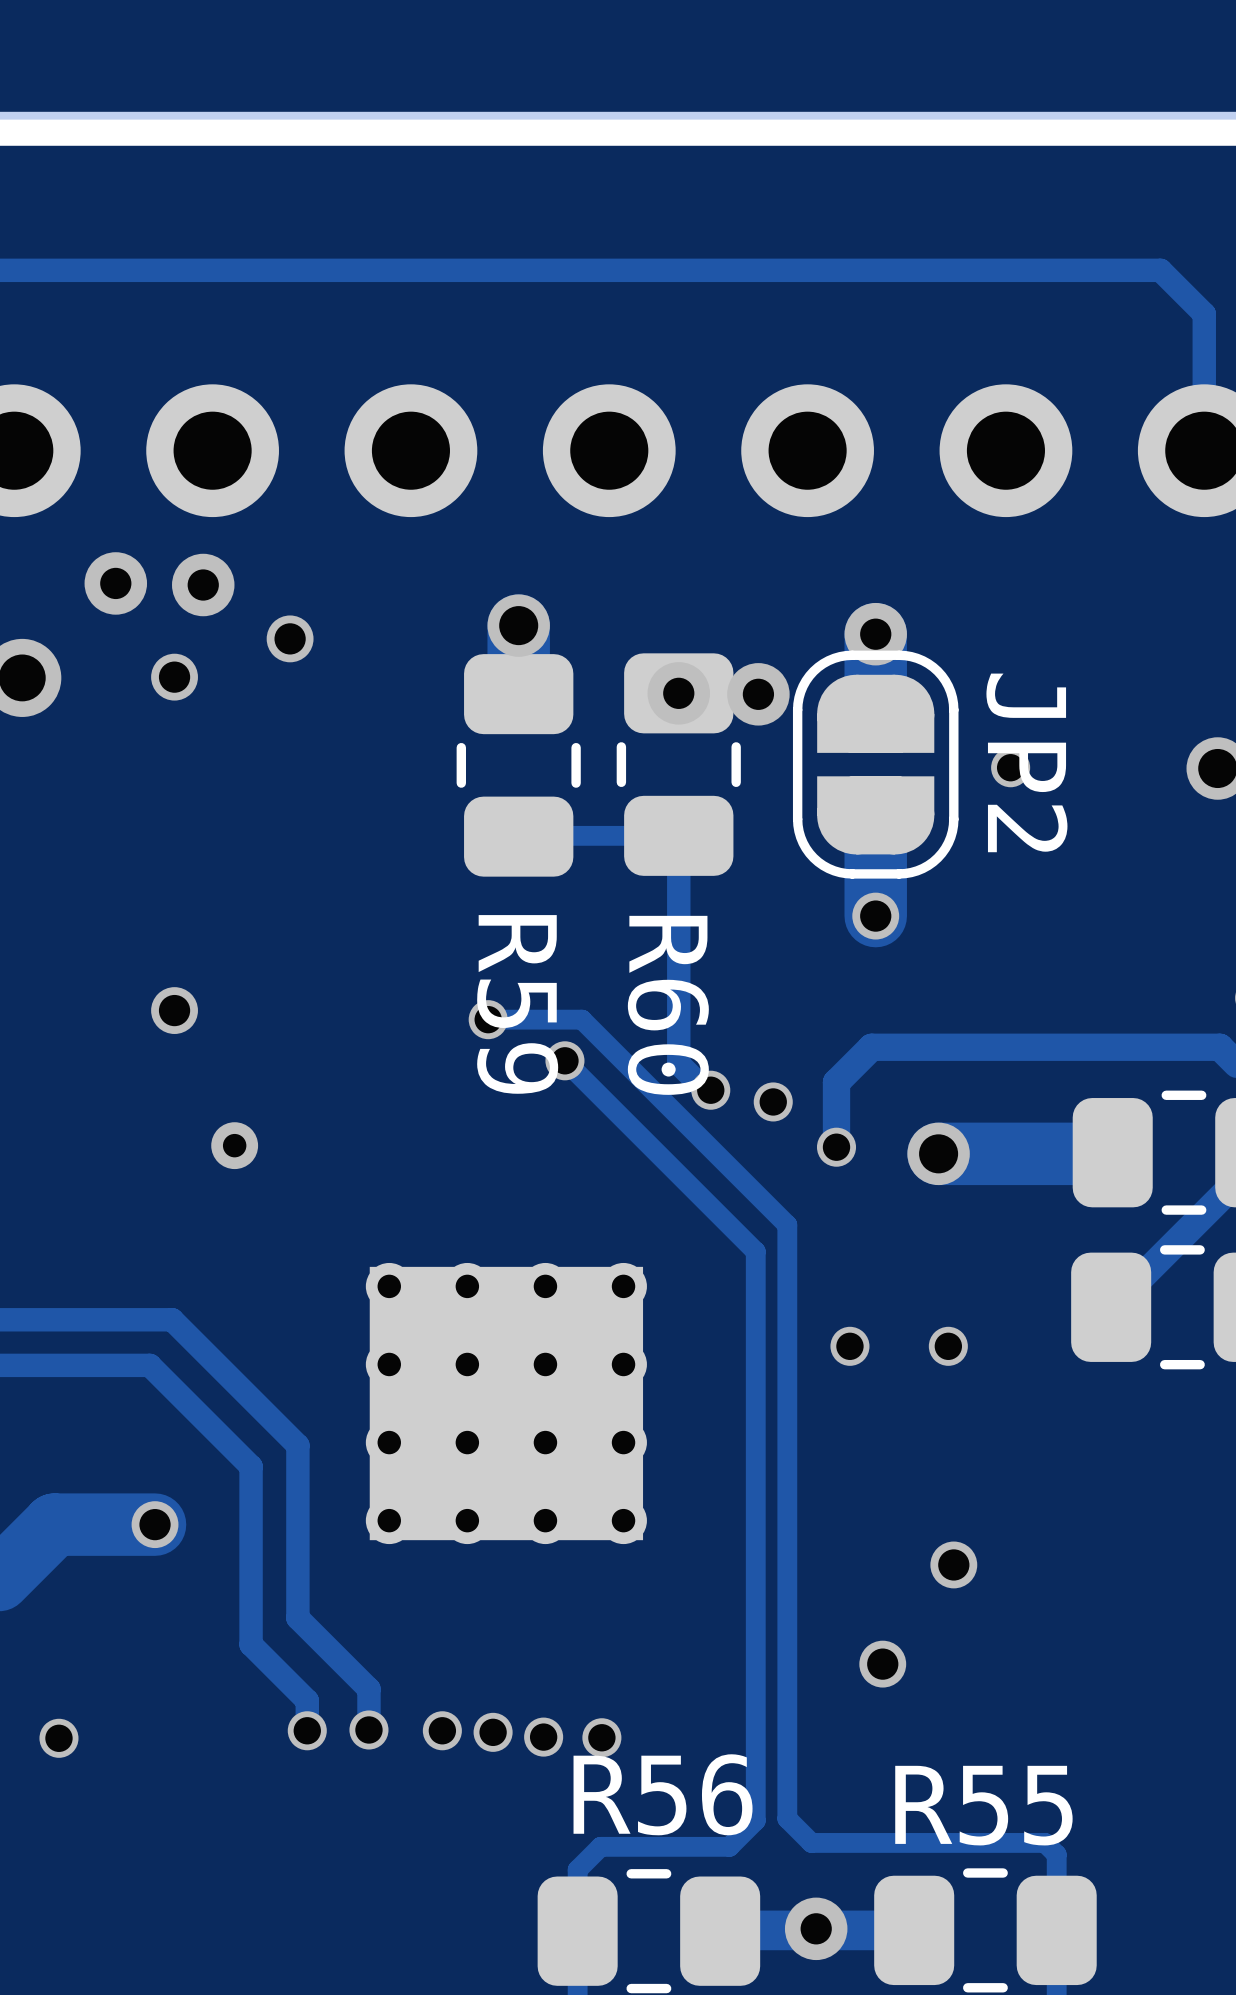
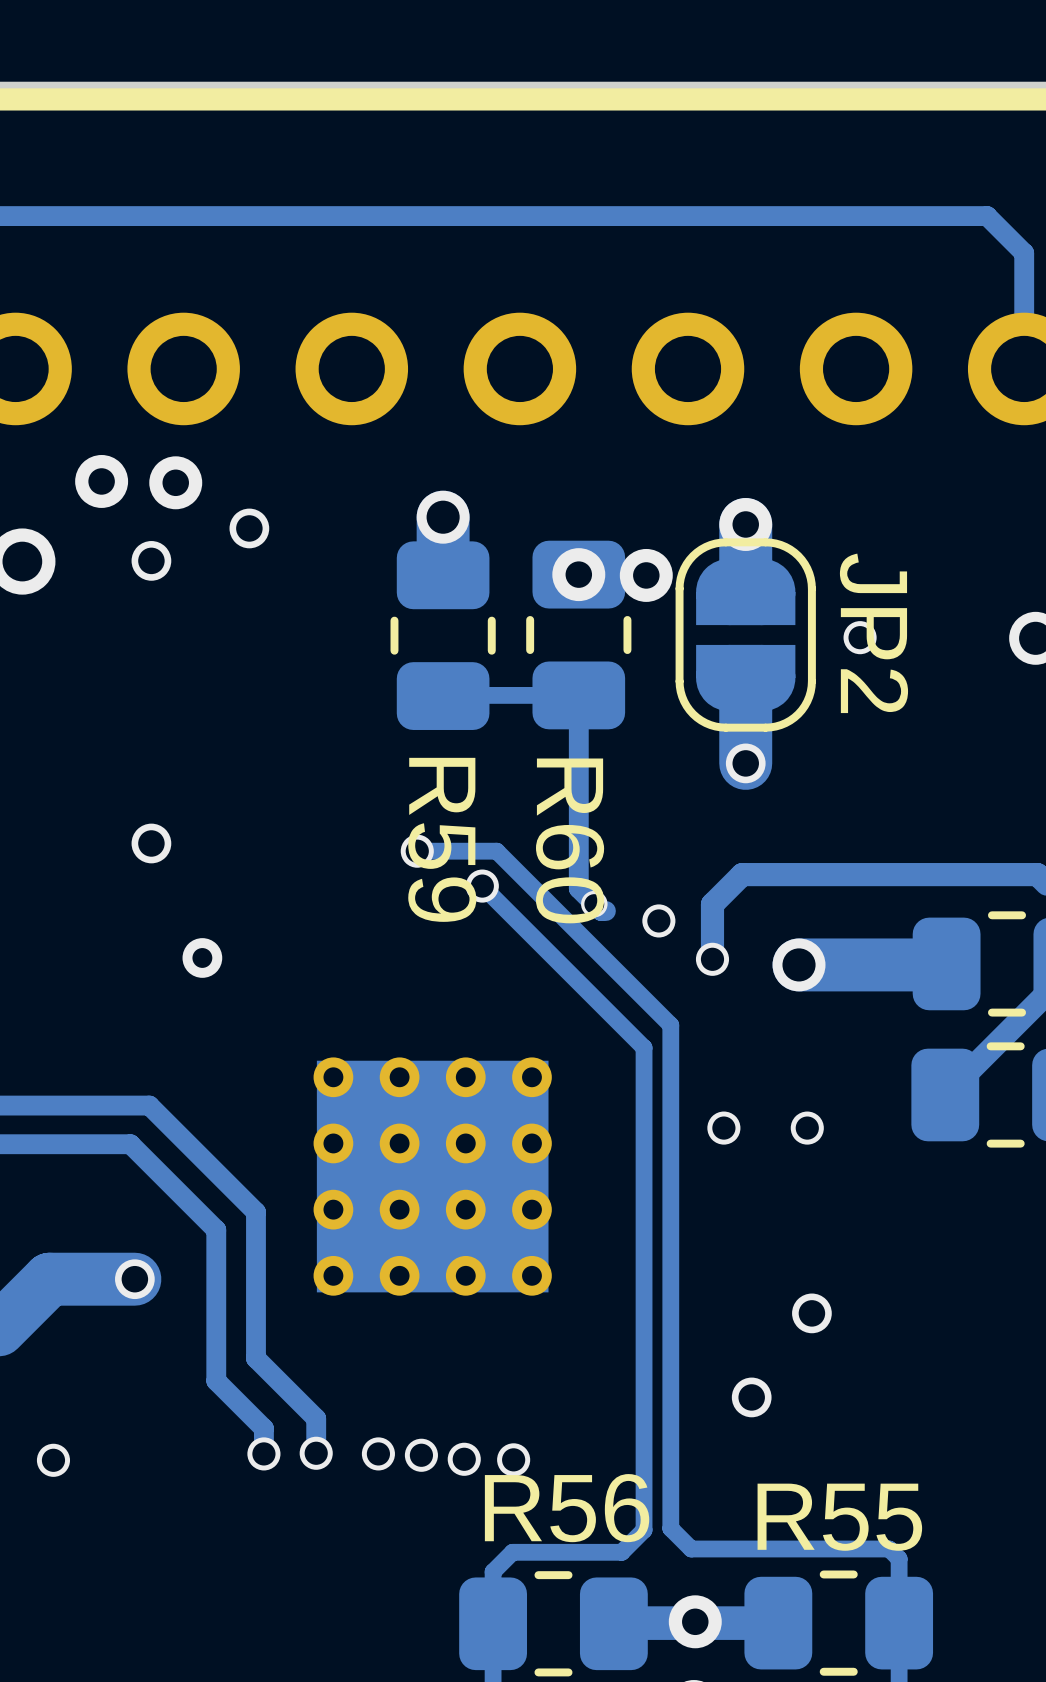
via position: (710, 1090) -> (594, 904)

